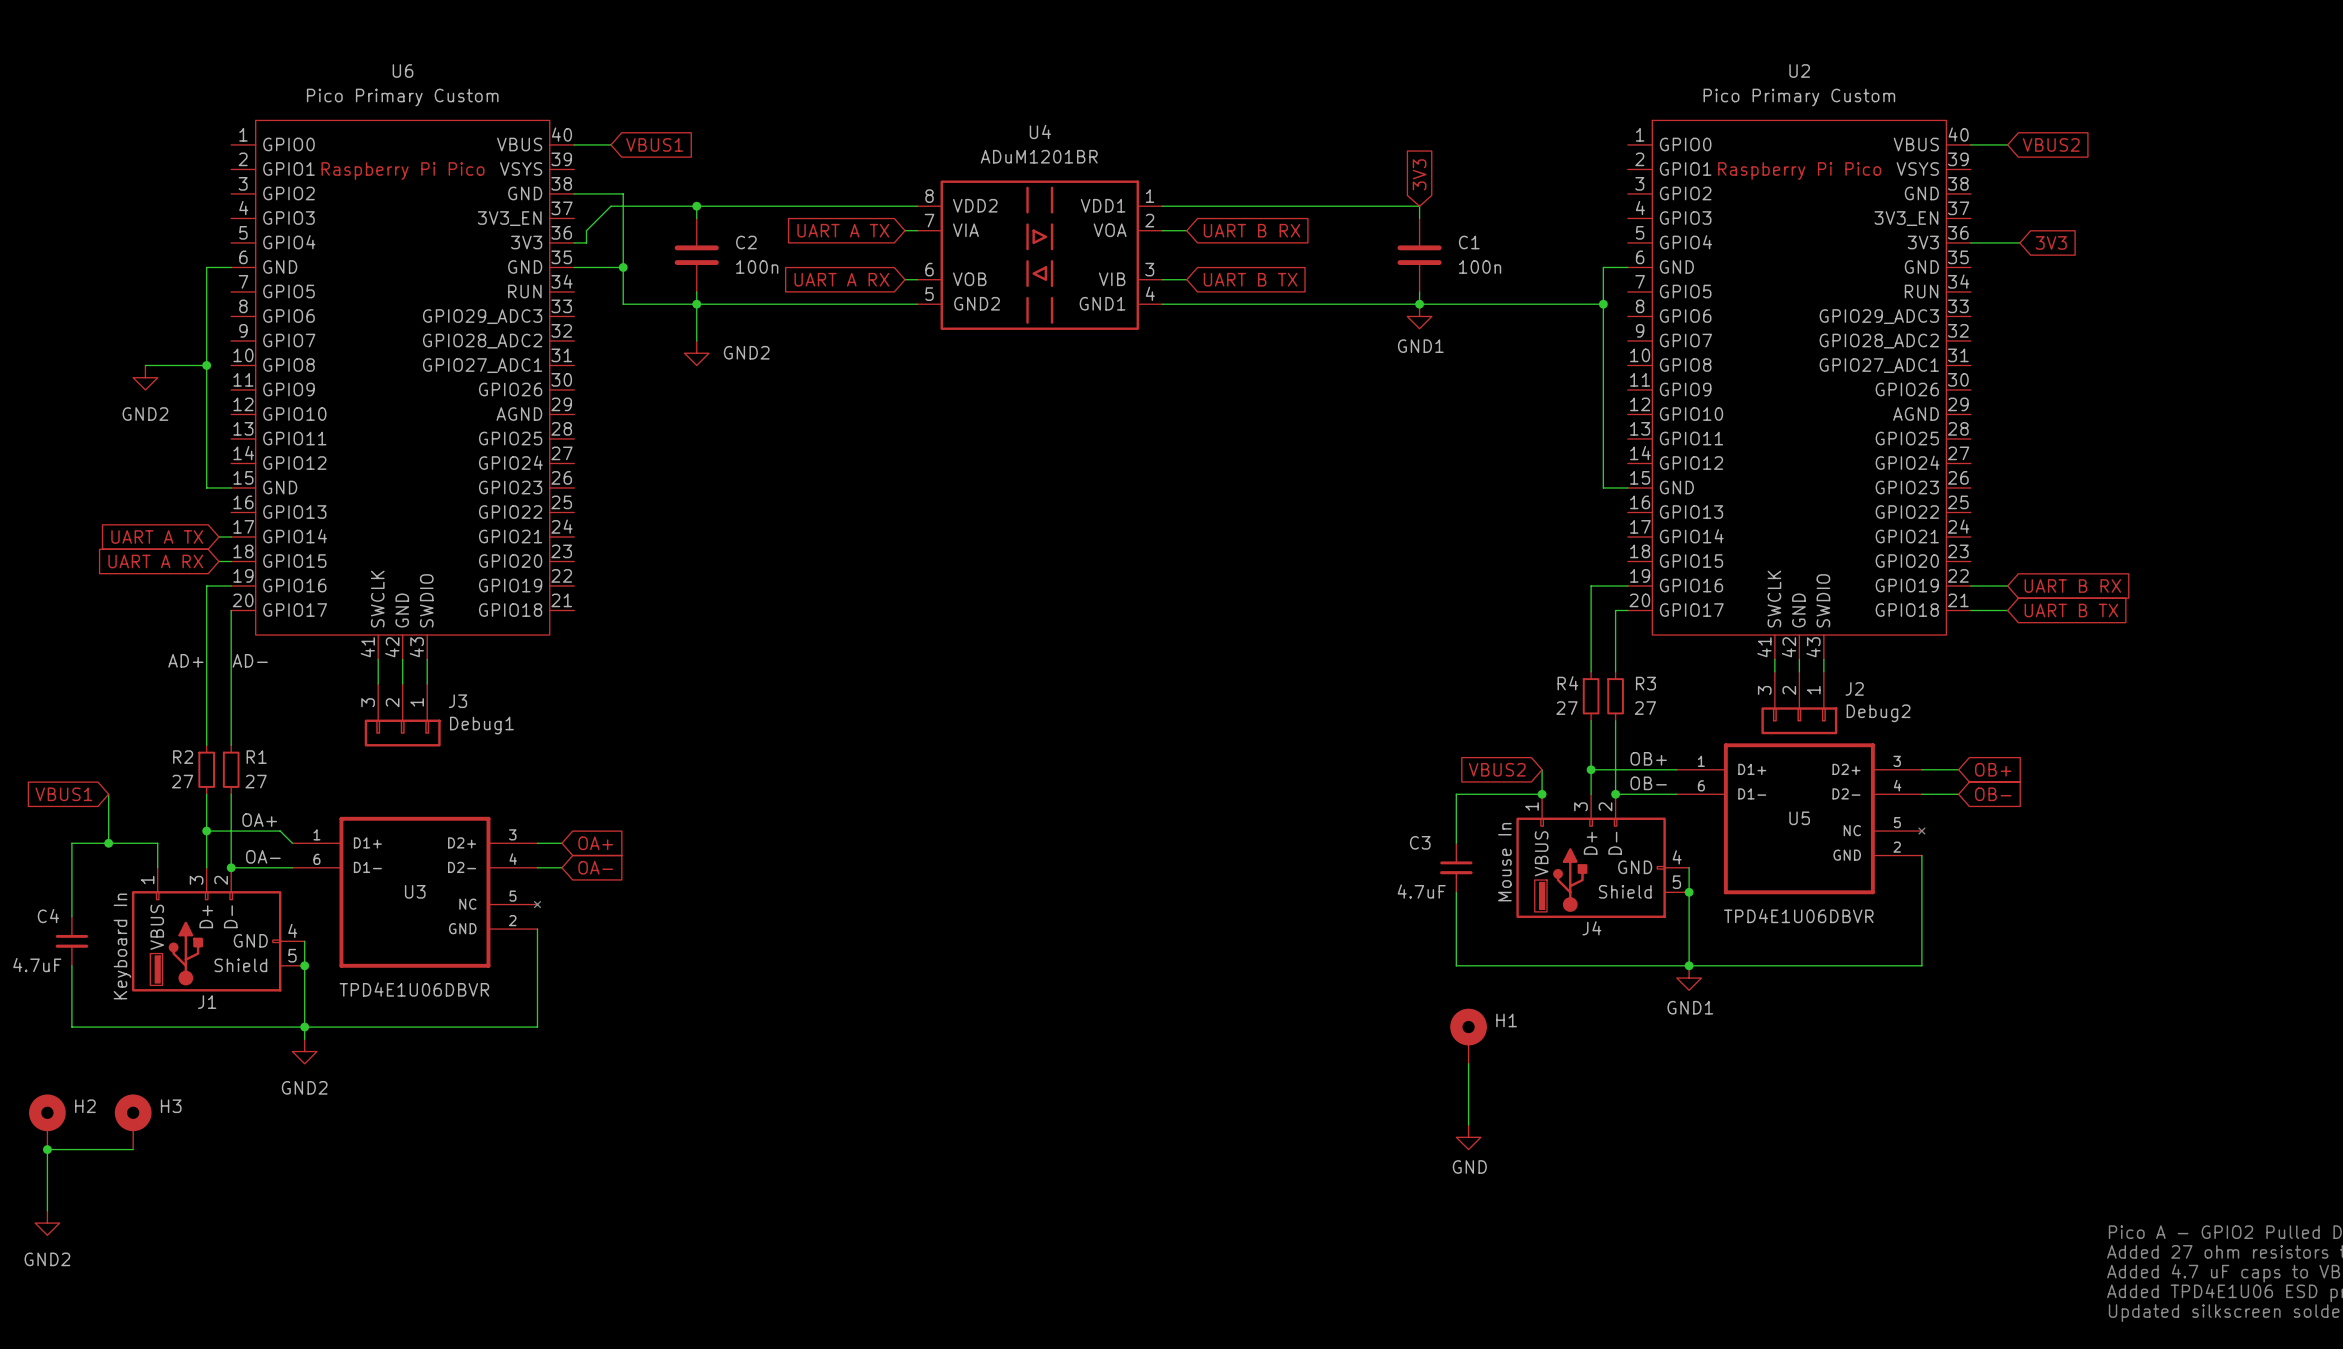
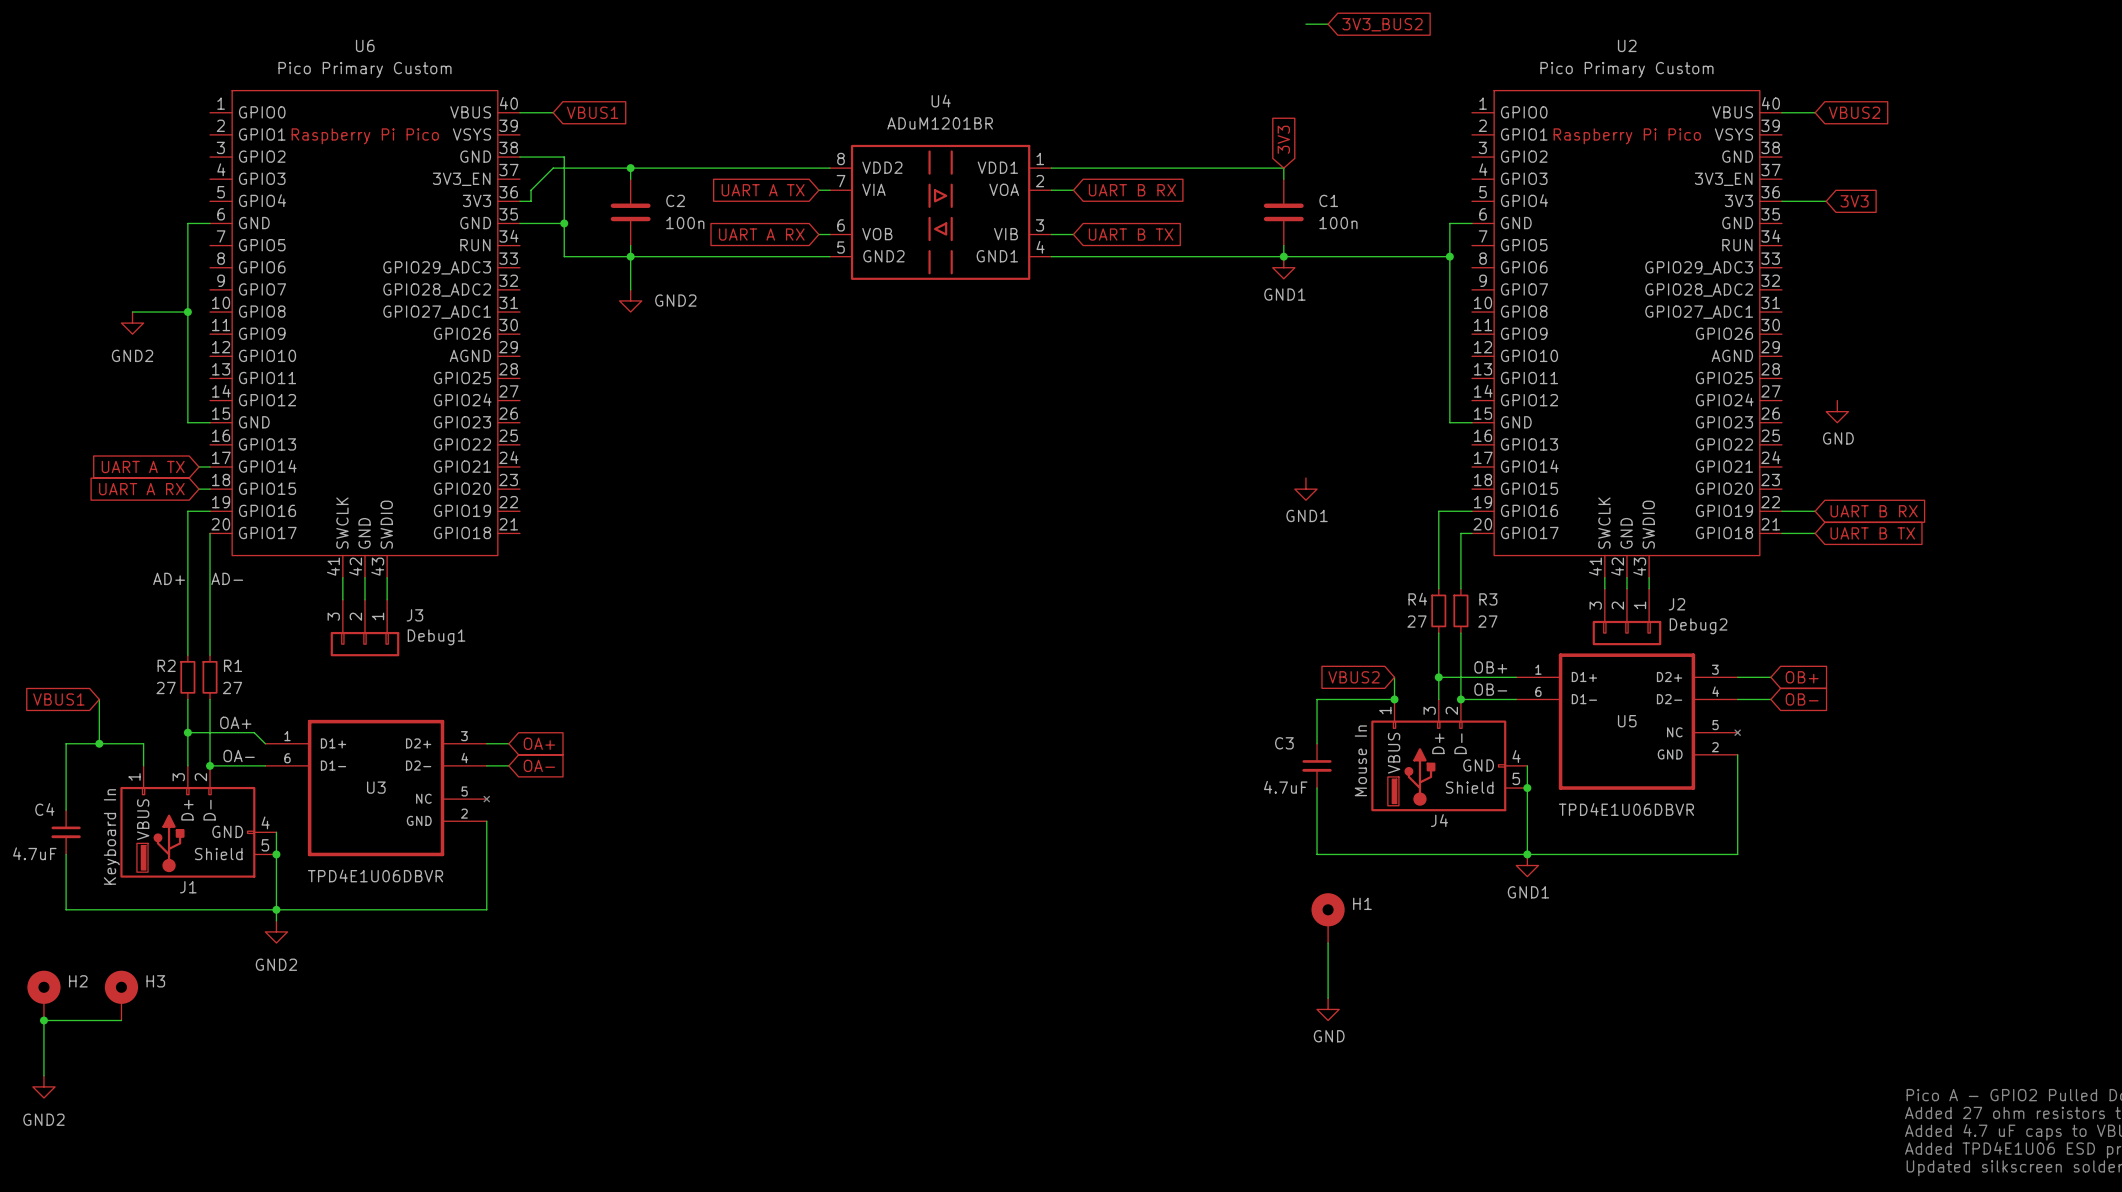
wire: none -> (1305, 24) (1328, 24)
global label: none -> 3V3_BUS2 (1382, 24)
power symbol: none -> GND (1837, 411)
power symbol: none -> GND1 (1305, 489)

